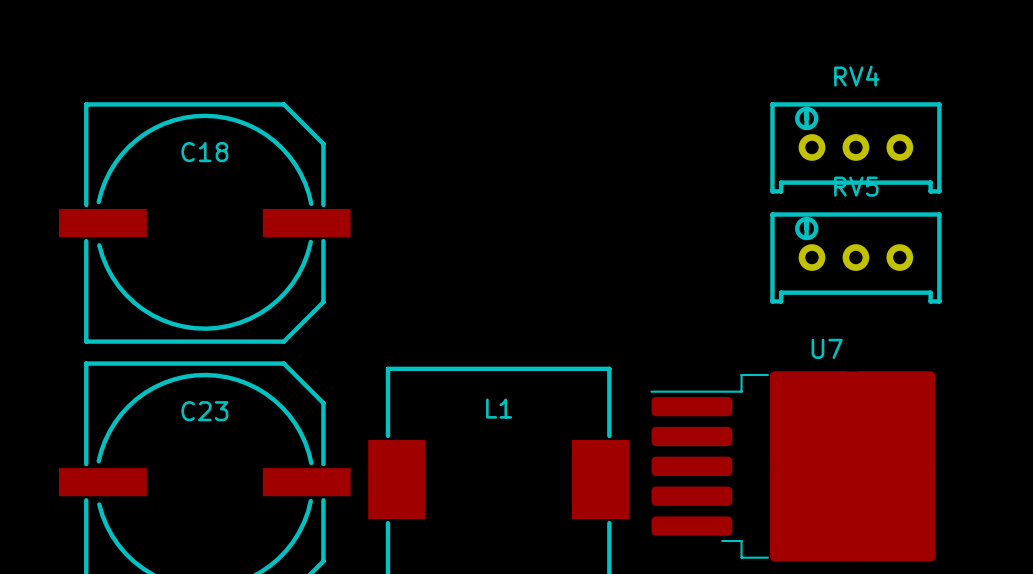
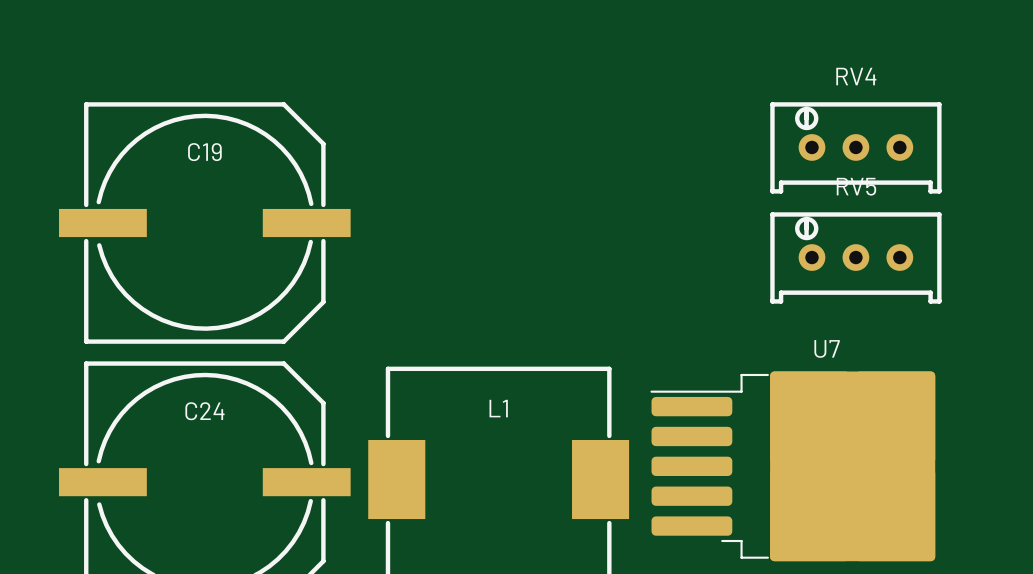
C18 name: C18 (204, 152) -> C19 (204, 152)
C23 name: C23 (204, 411) -> C24 (204, 411)

